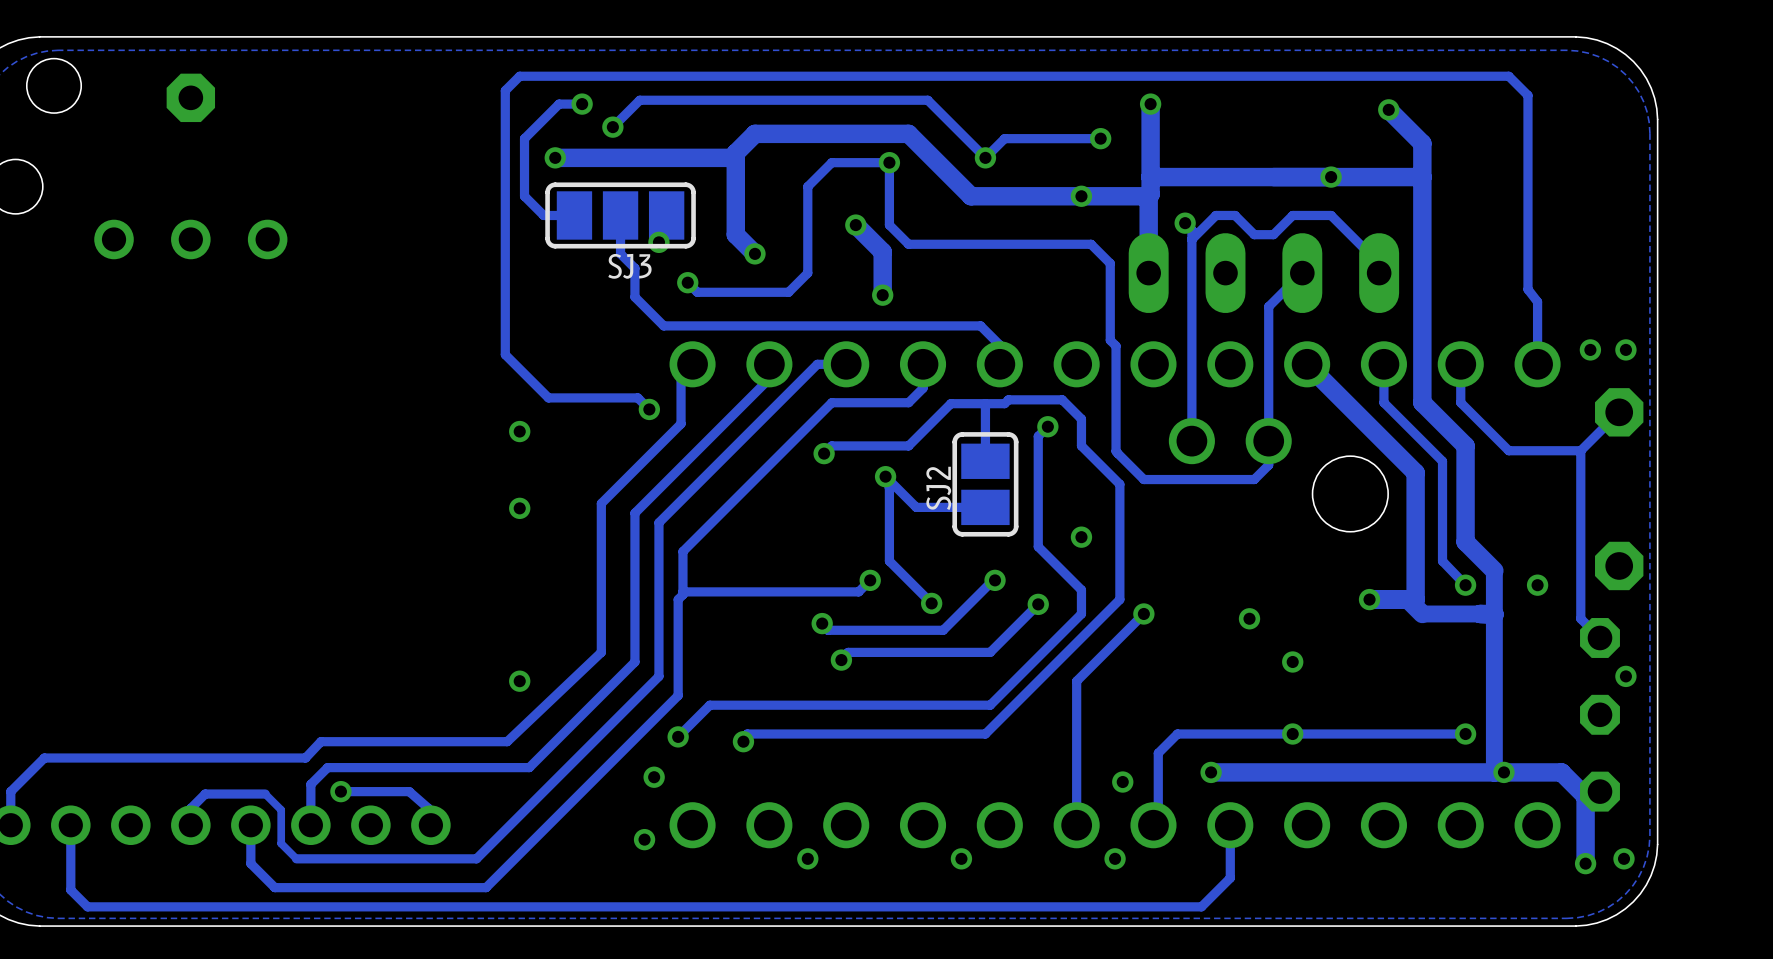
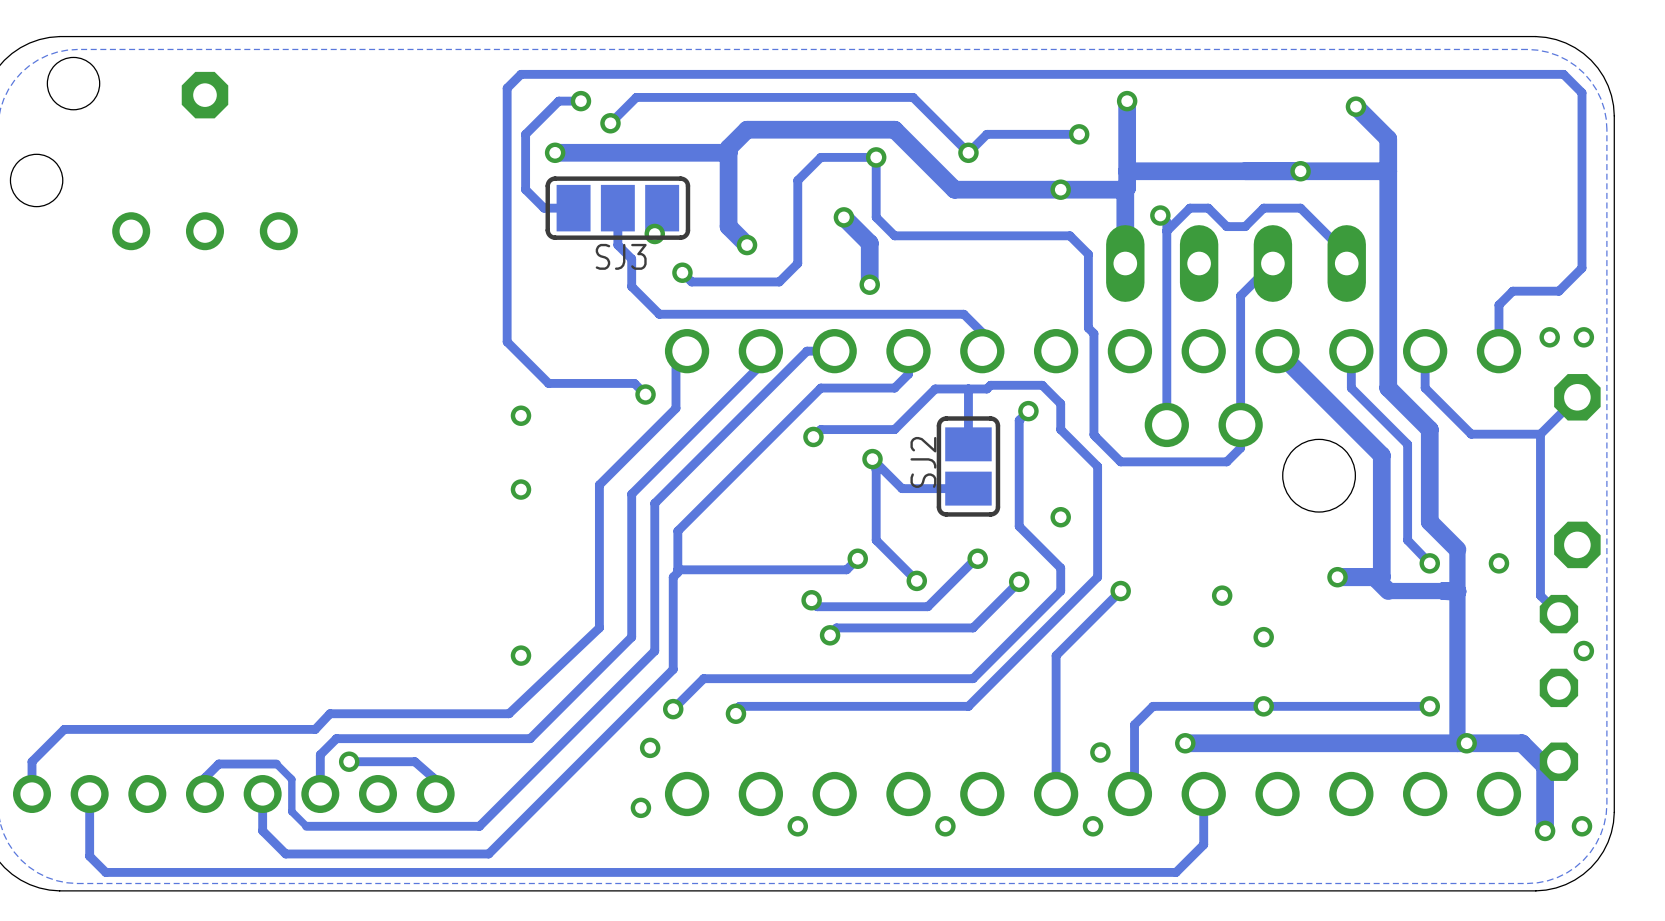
track: (1508, 76) (1527, 95) (1527, 289) (1537, 301) (1537, 316) -> (1471, 74) (1563, 74) (1581, 92) (1581, 268) (1558, 291) (1512, 291) (1498, 305)

